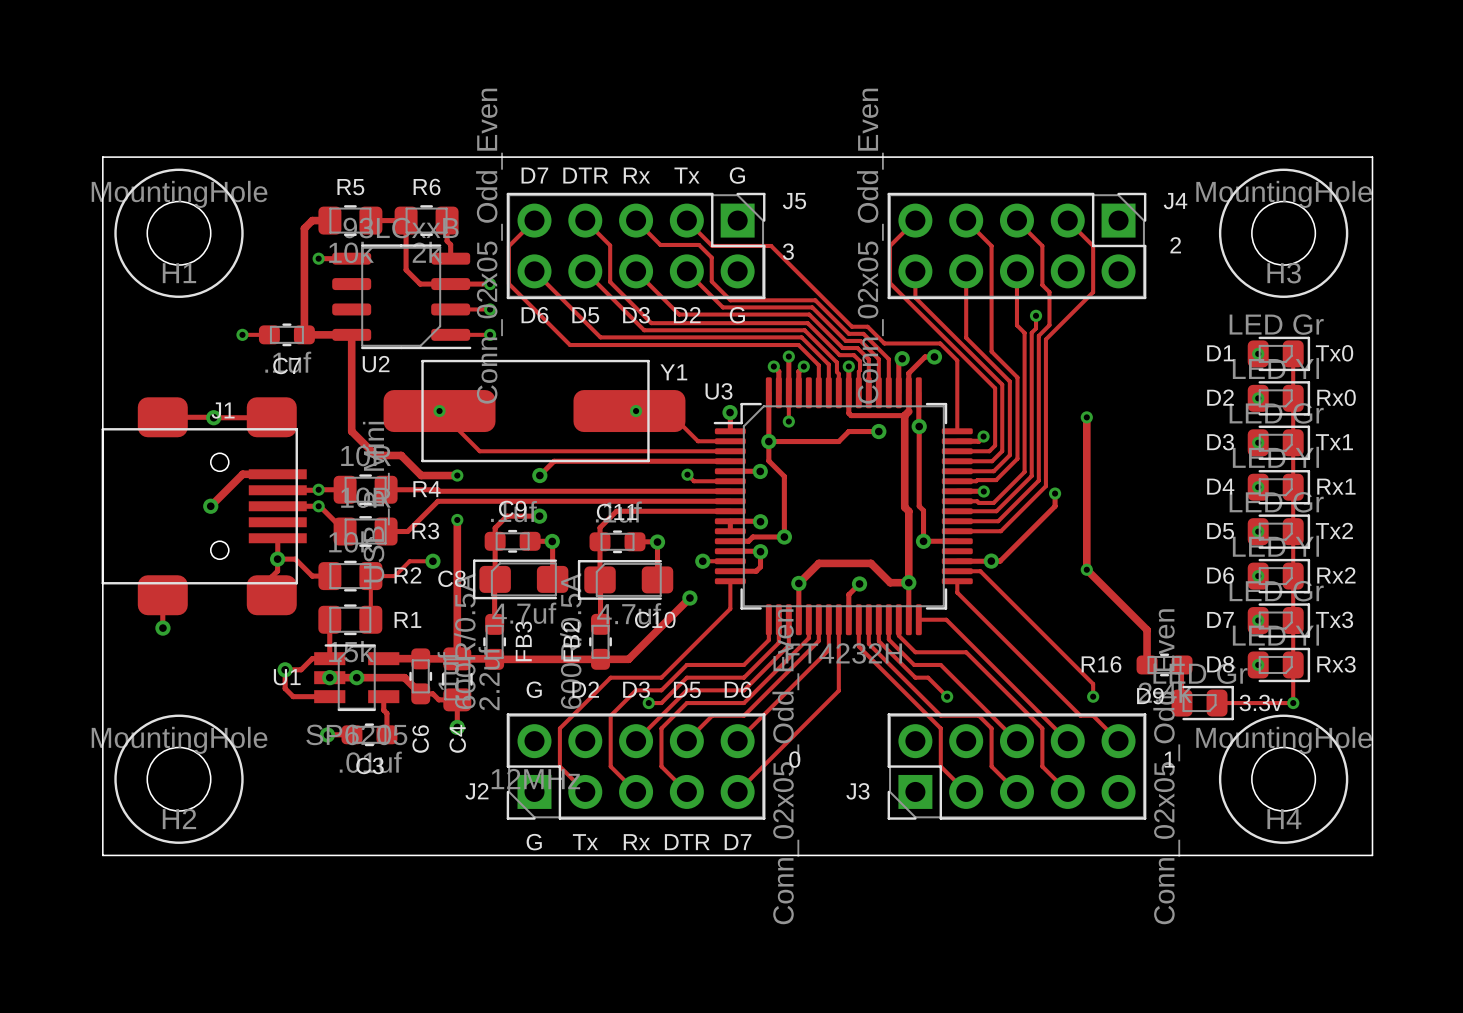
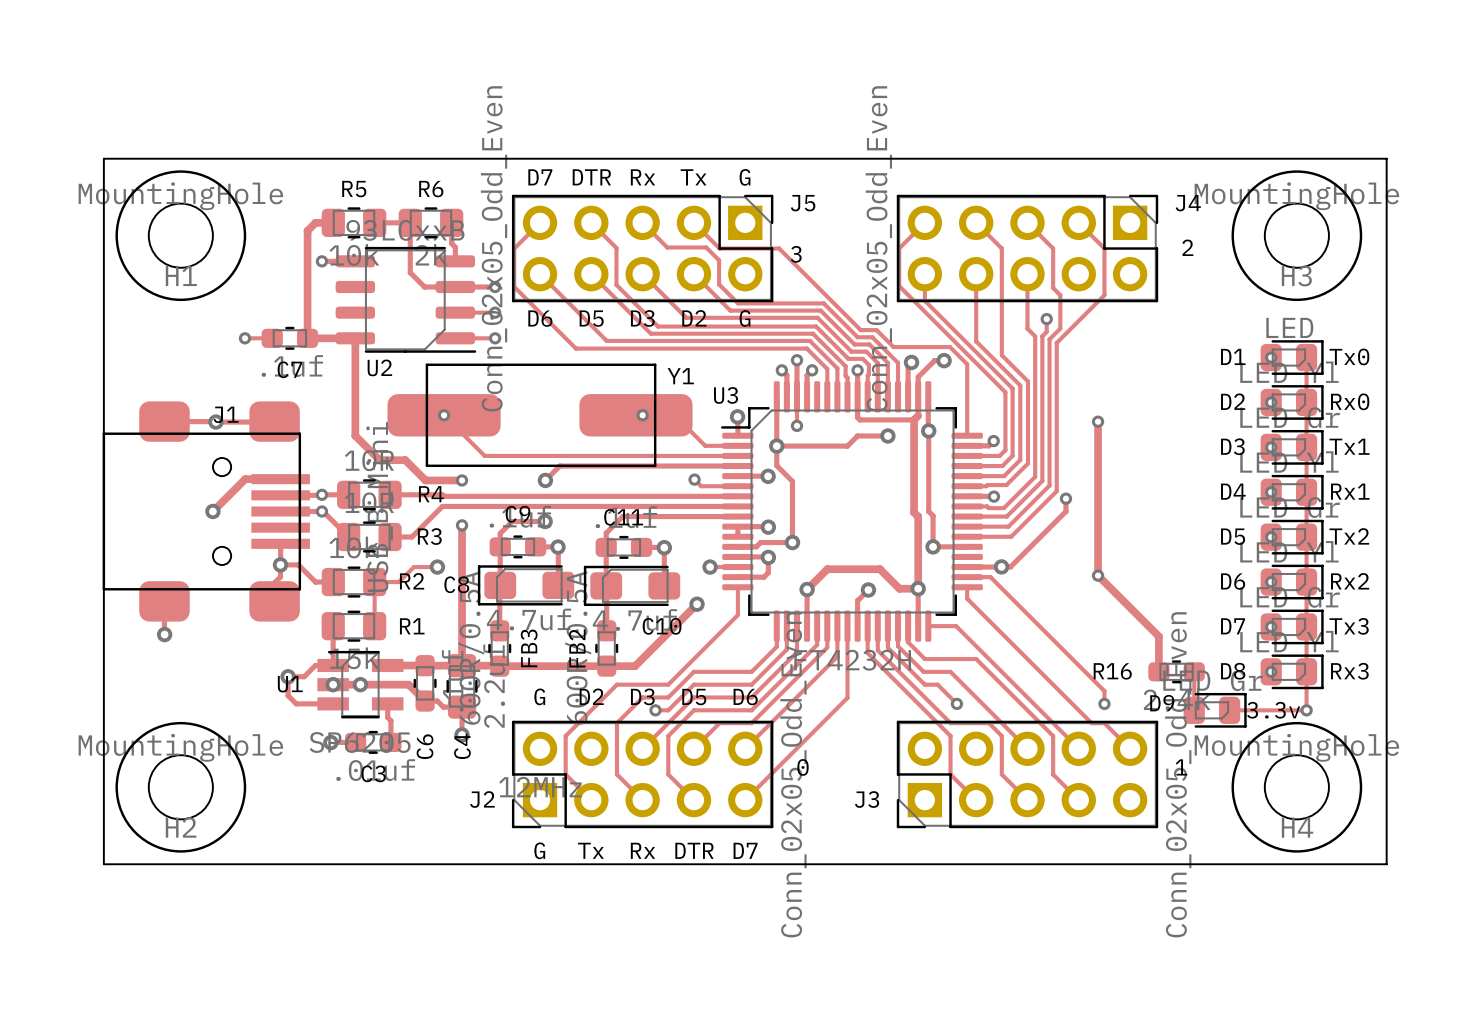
D1 value: LED Gr (1276, 324) -> LED (1289, 327)

